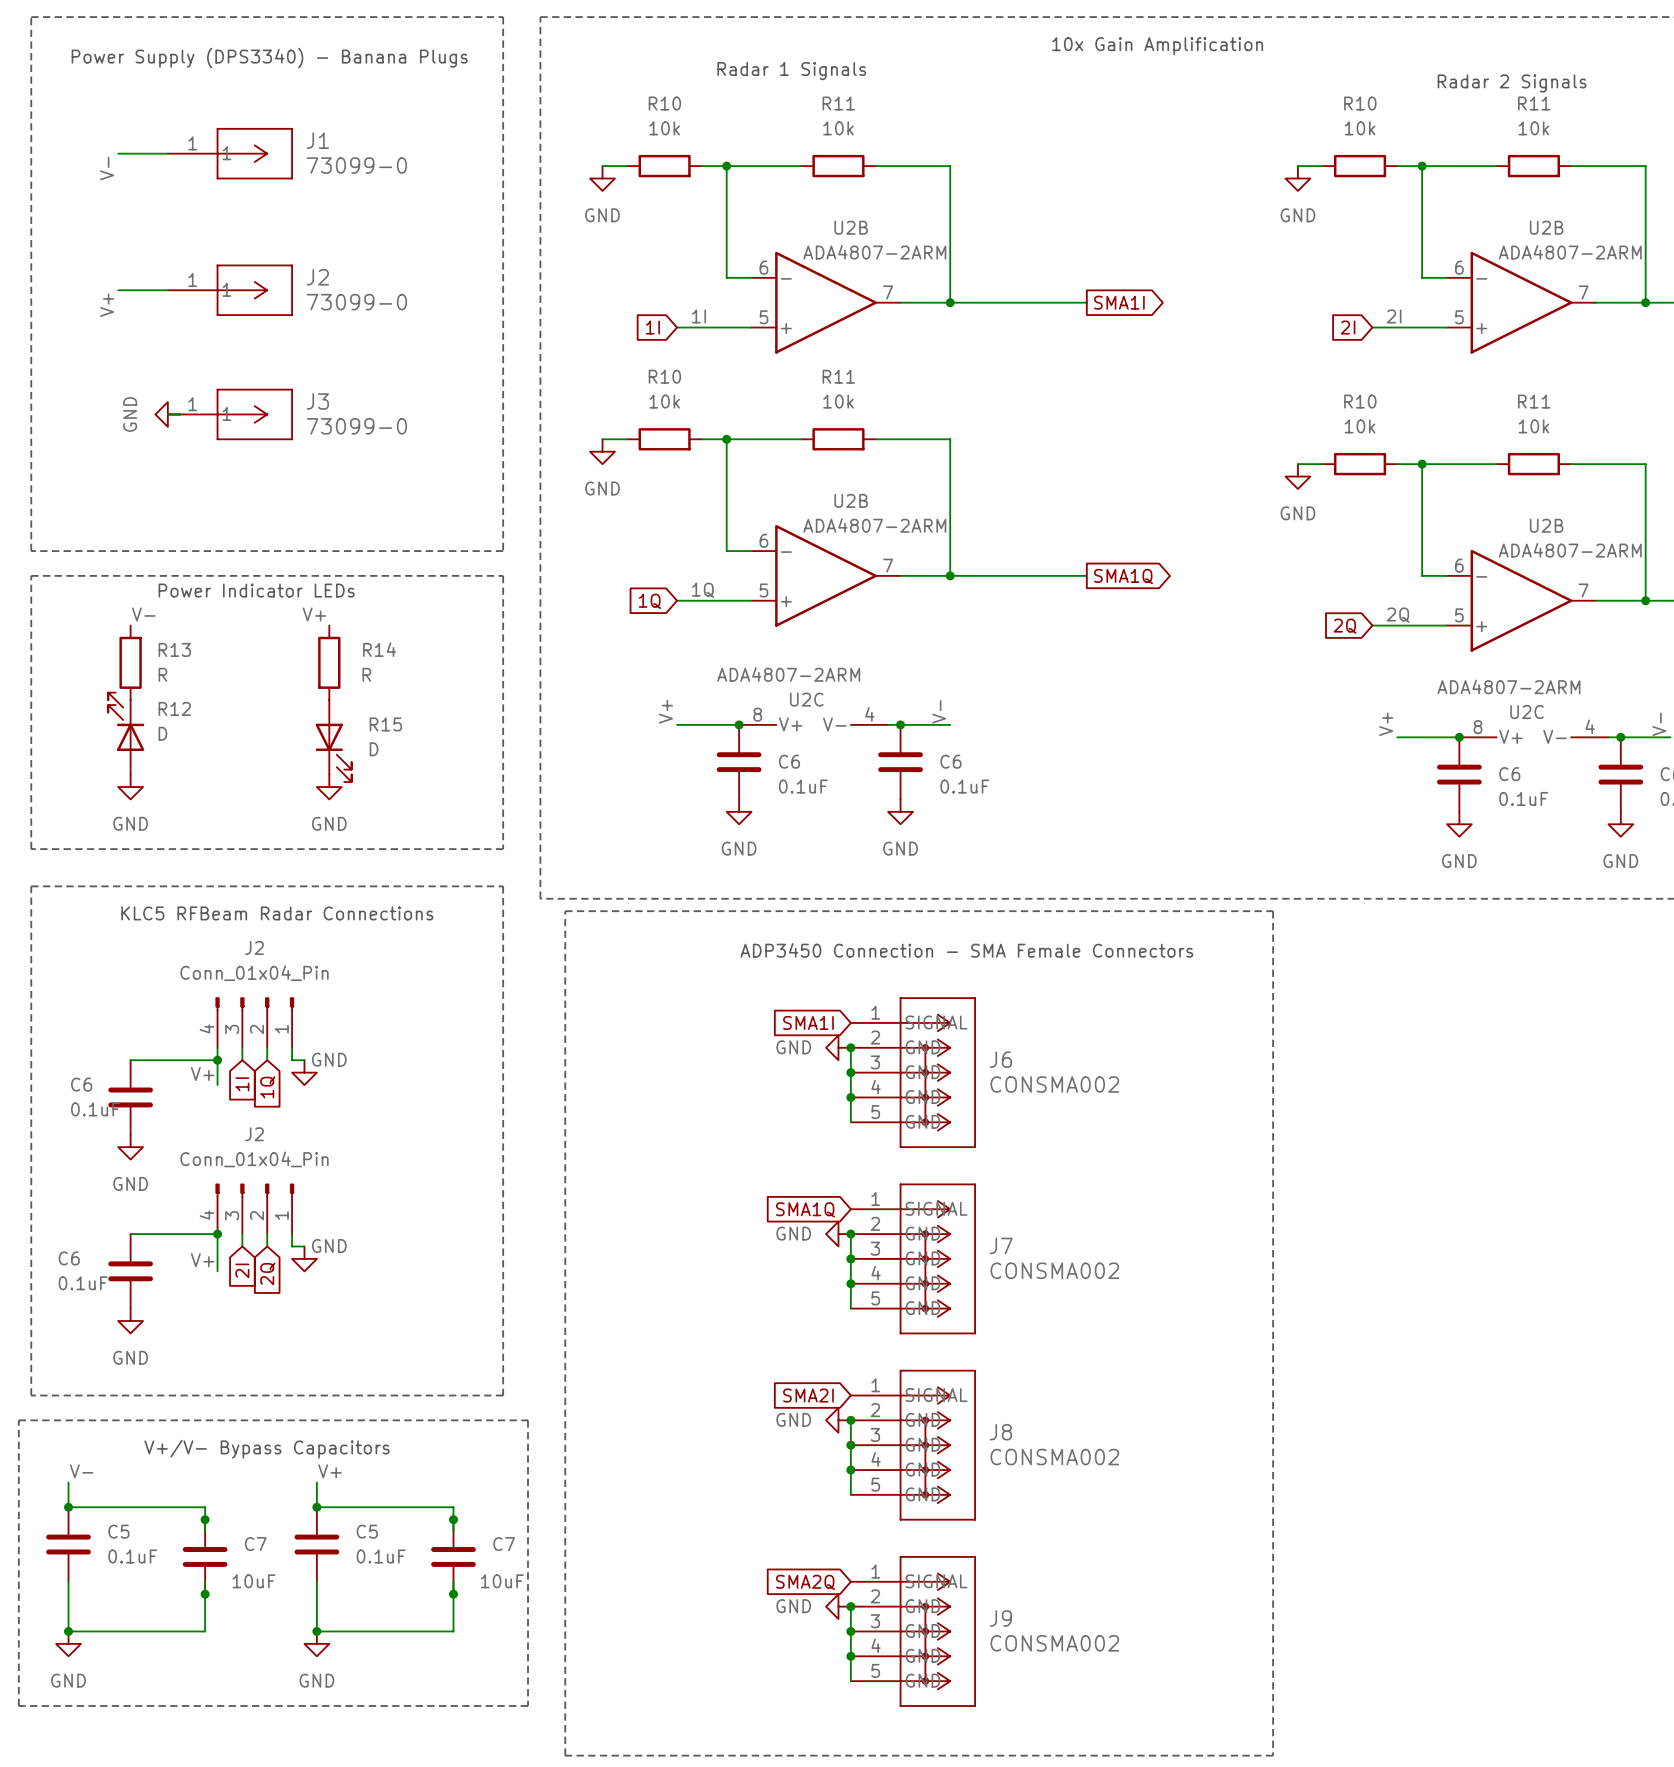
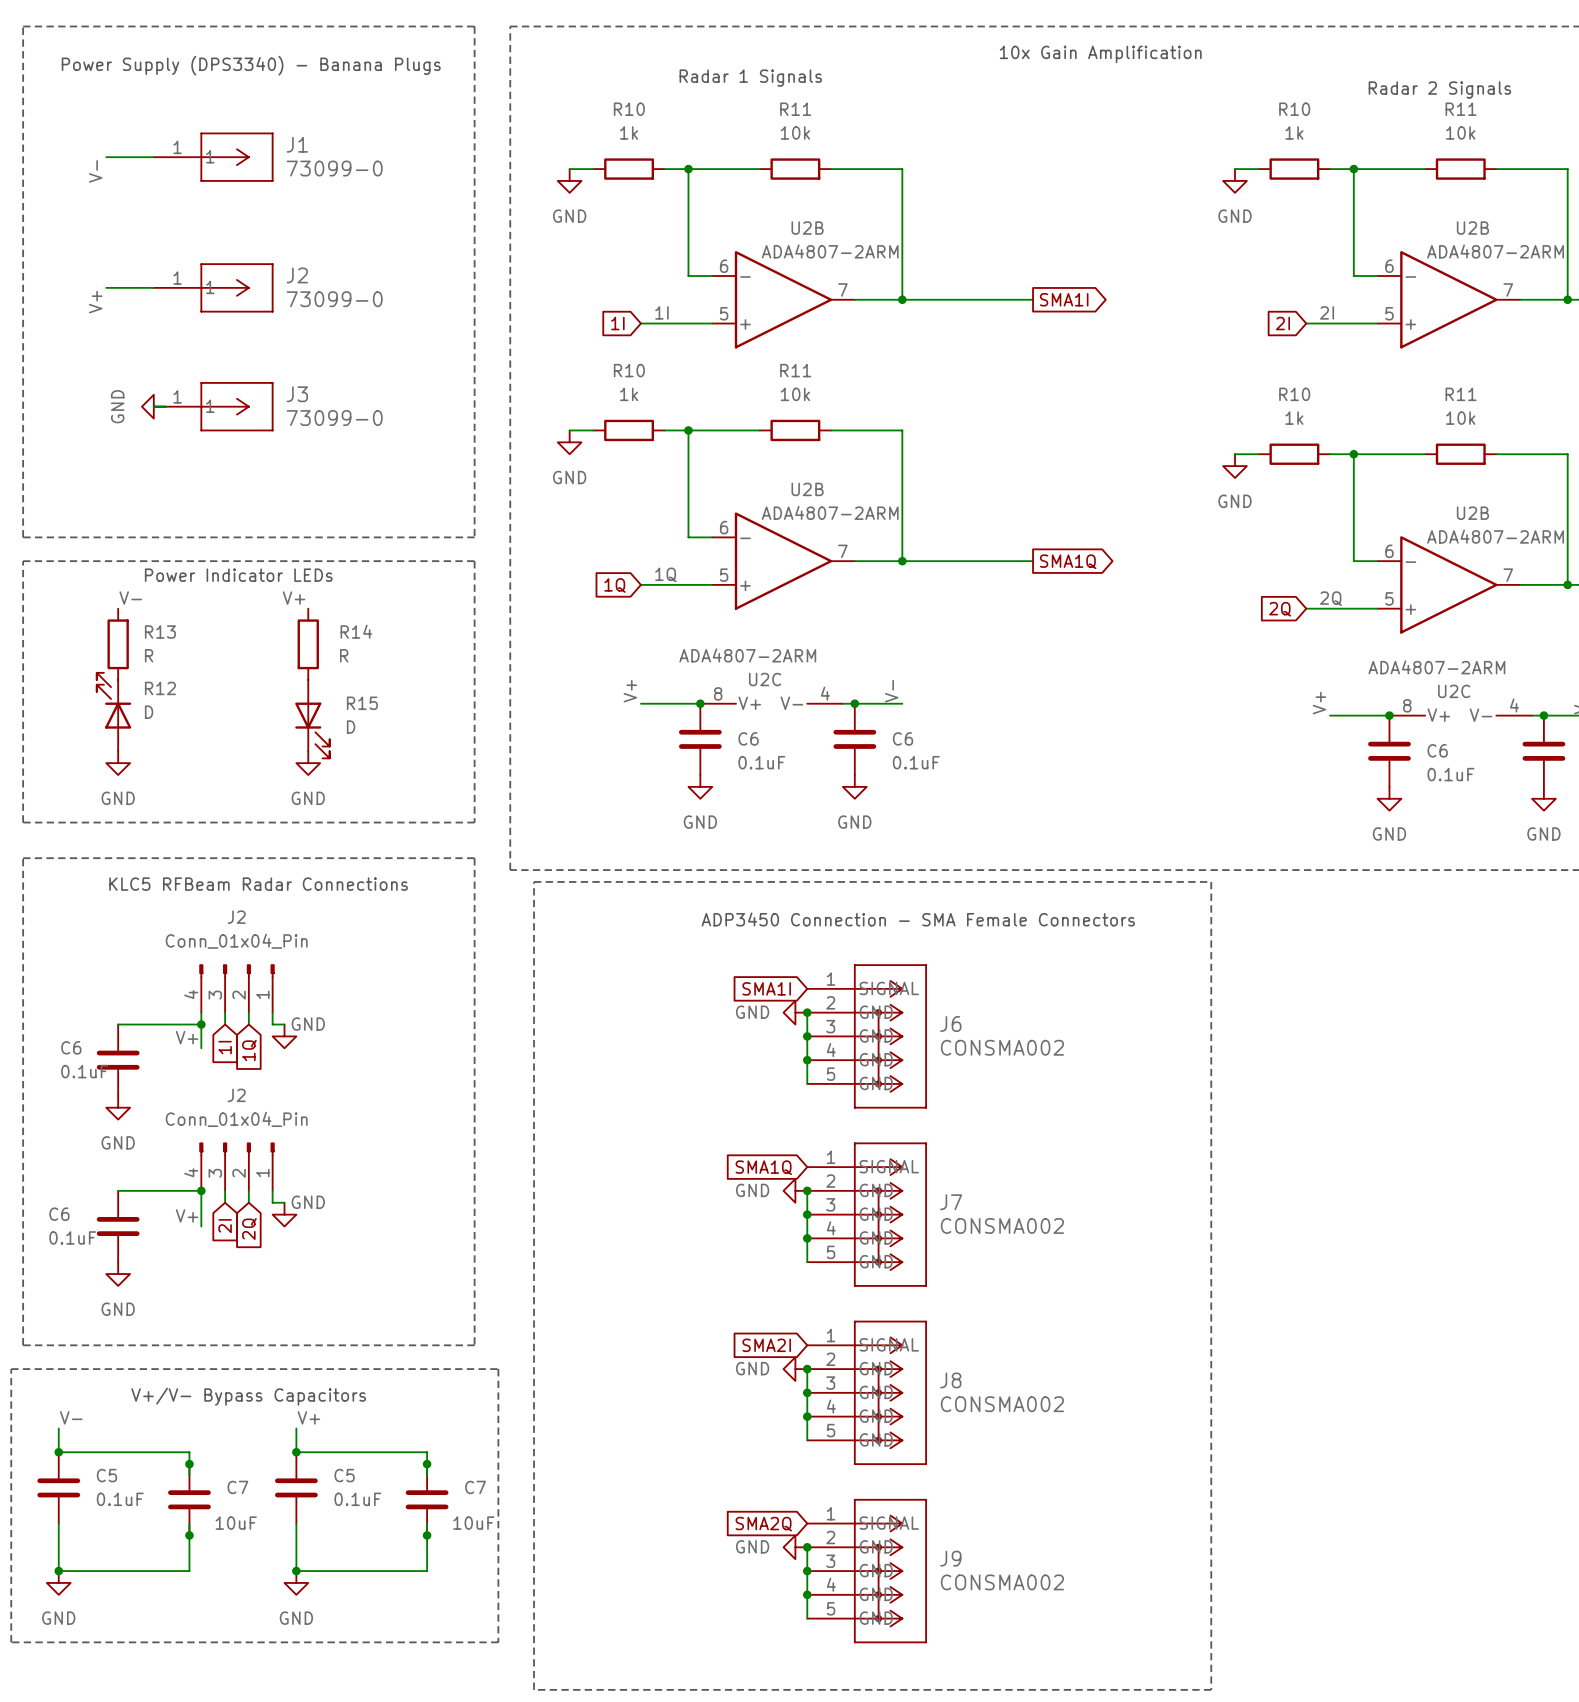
R10 value: 10k (664, 128) -> 1k (629, 132)
R10 value: 10k (1360, 128) -> 1k (1294, 132)
R10 value: 10k (664, 401) -> 1k (629, 394)
R10 value: 10k (1360, 426) -> 1k (1294, 418)

